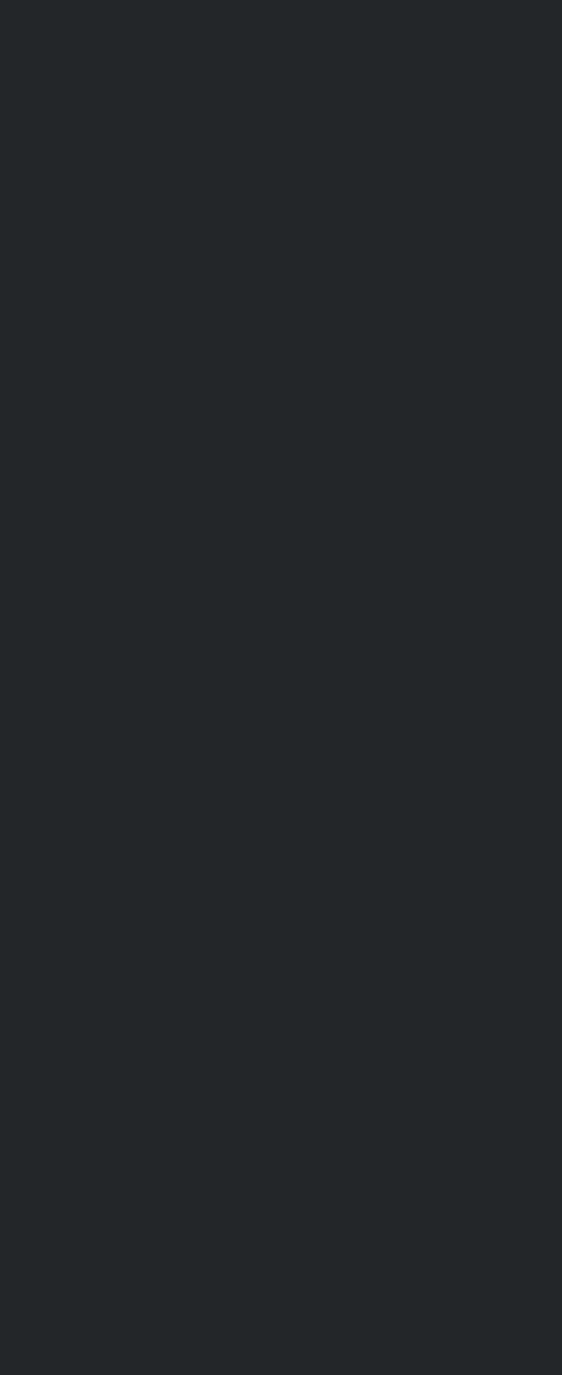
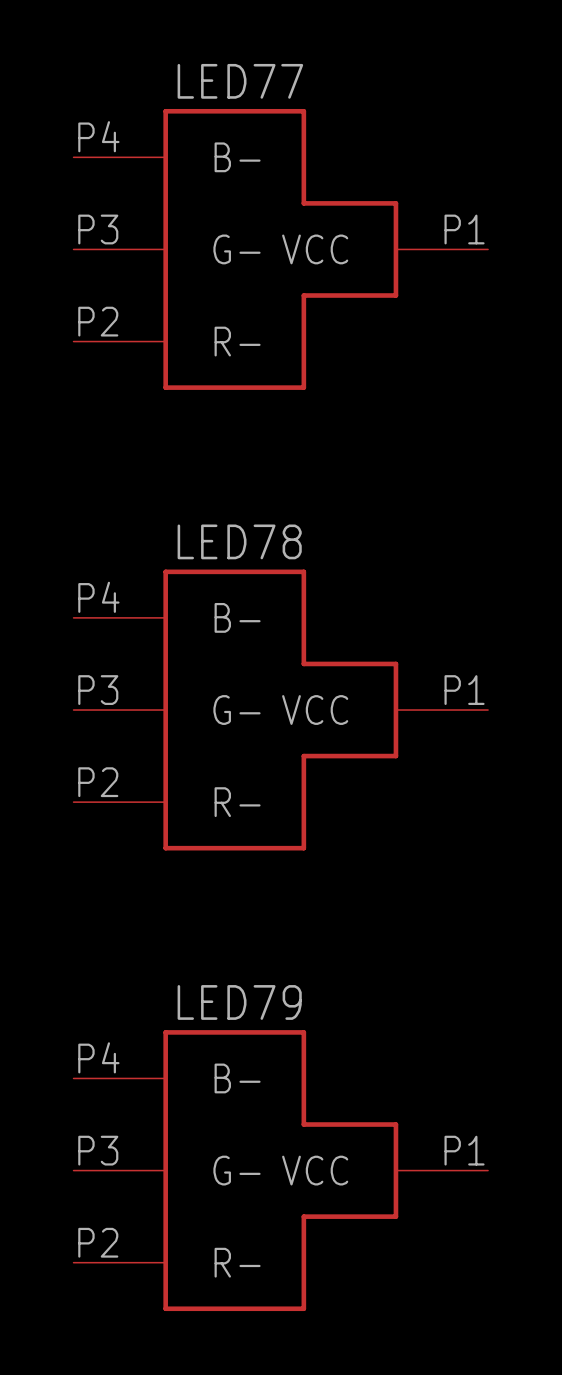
LED77: none -> (280, 249)
LED78: none -> (280, 710)
LED79: none -> (280, 1170)

